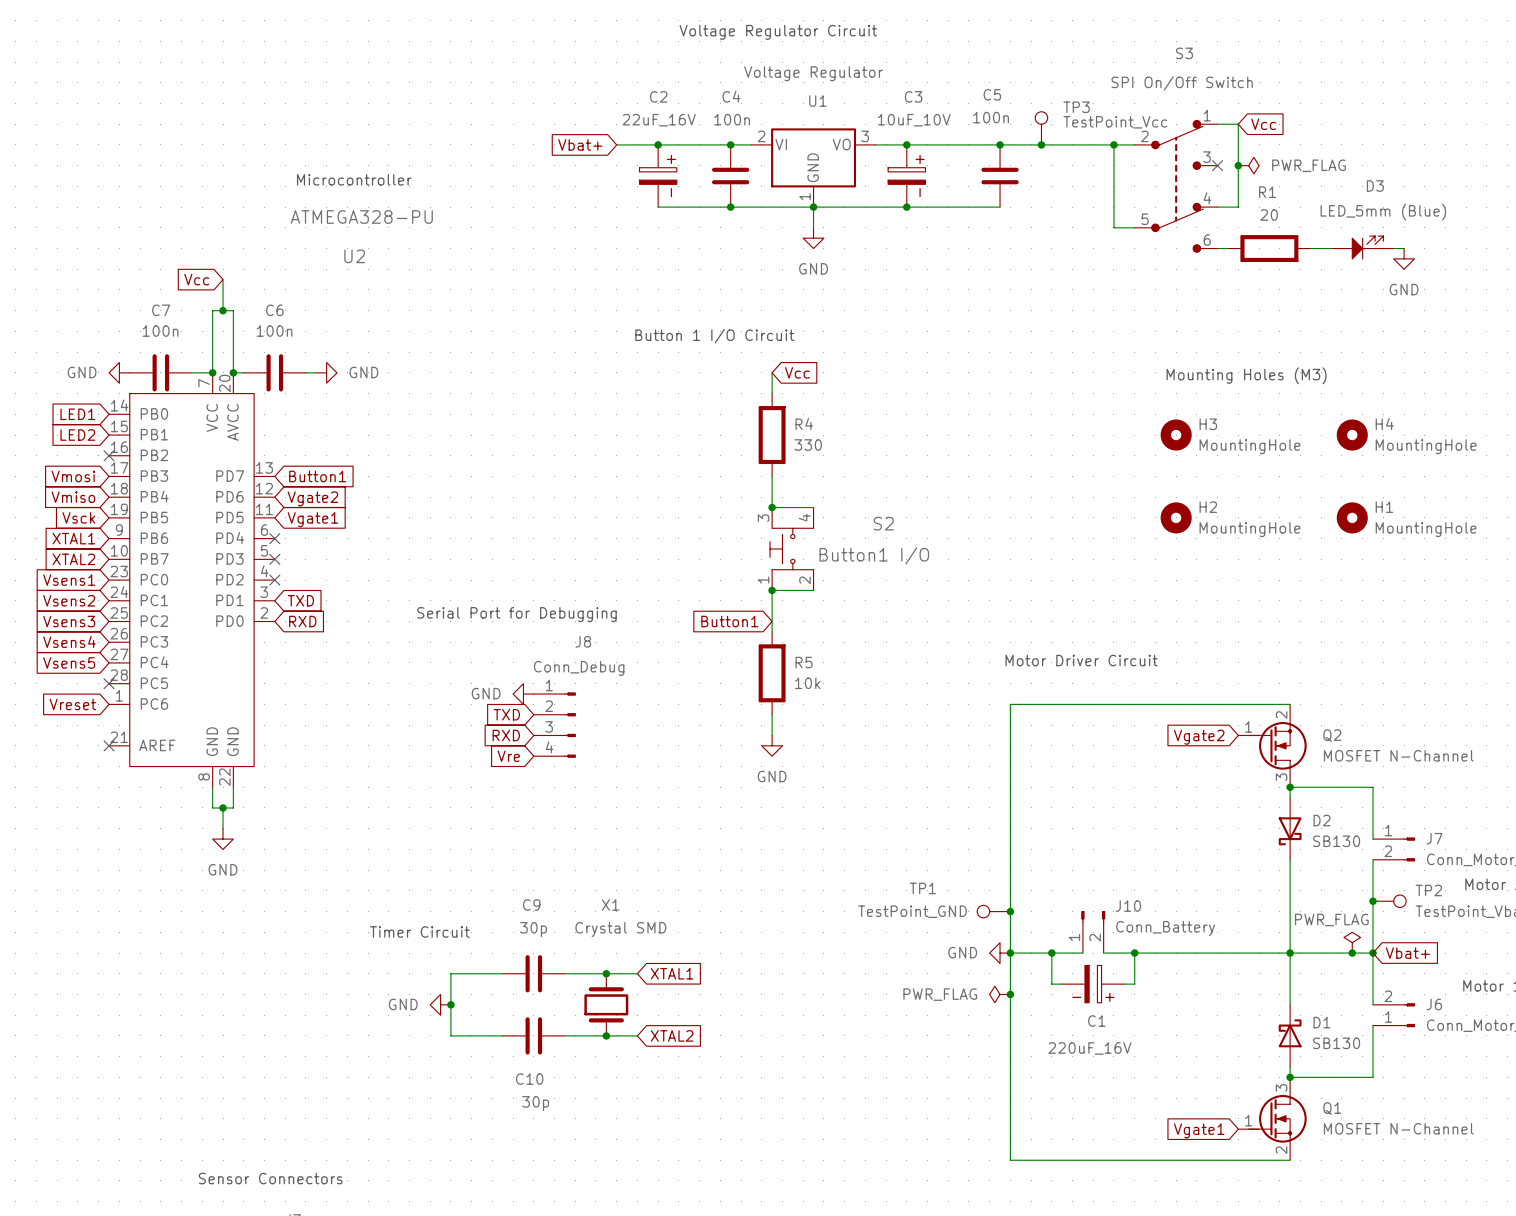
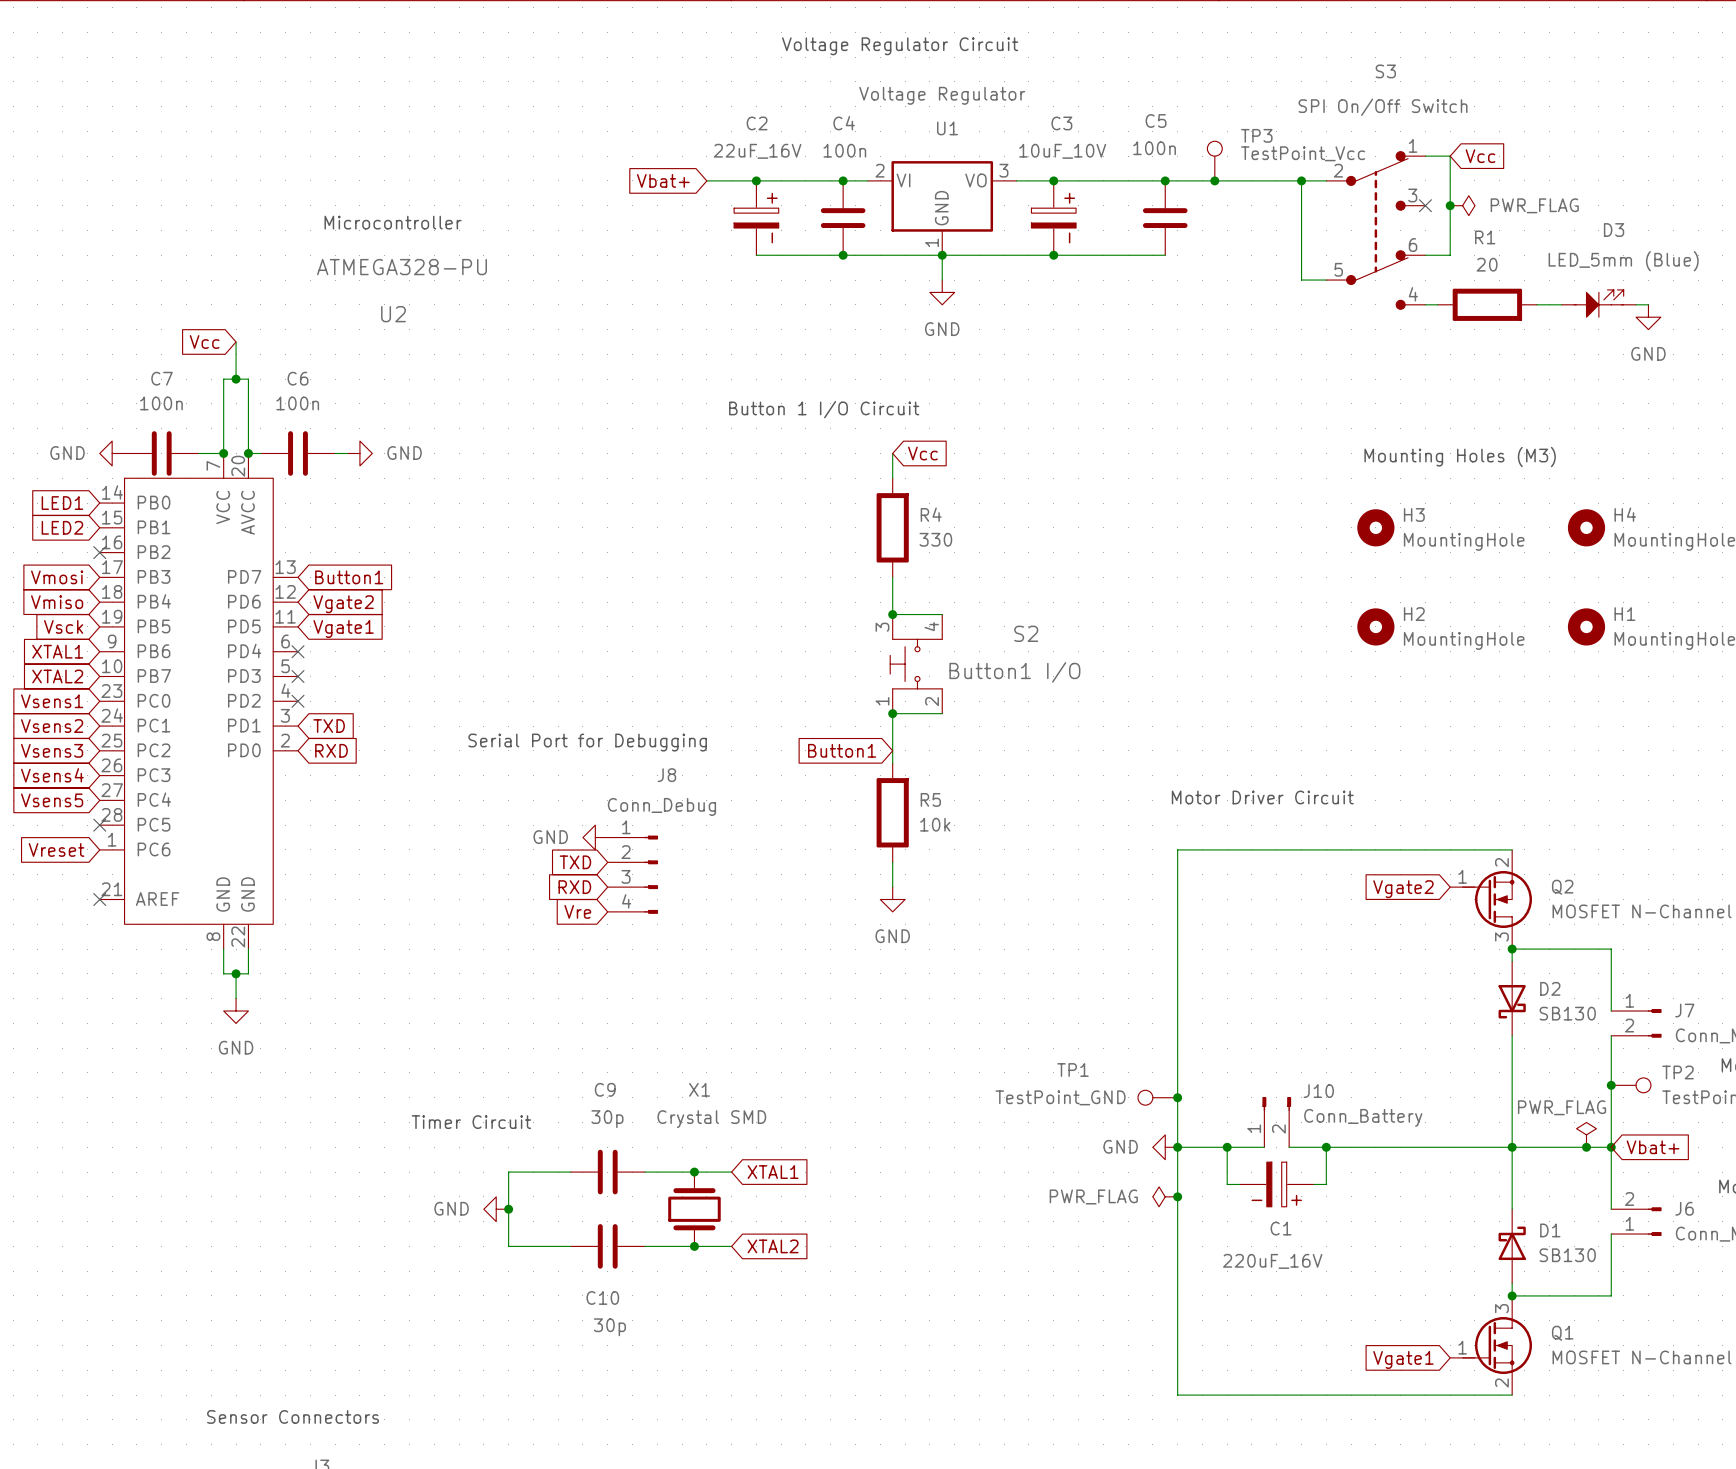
S3 pin number: 4 (1207, 198) -> 6 (1413, 245)
S3 pin number: 6 (1207, 239) -> 4 (1413, 294)

